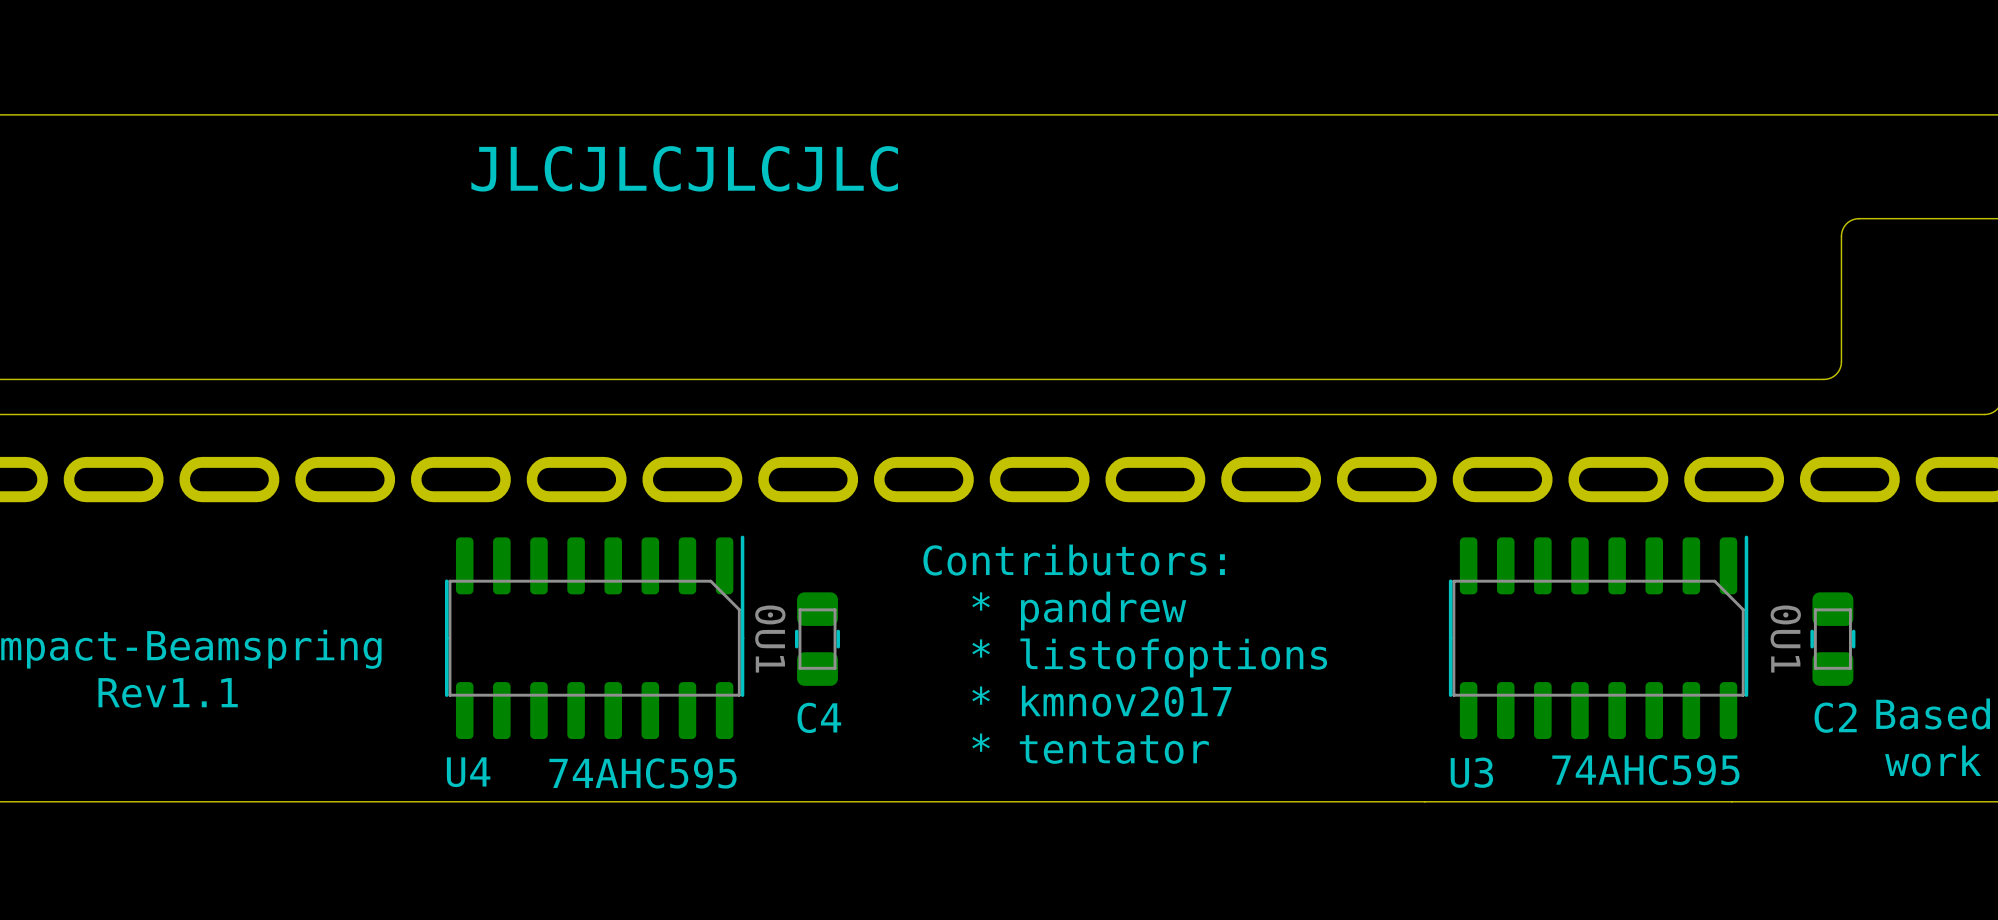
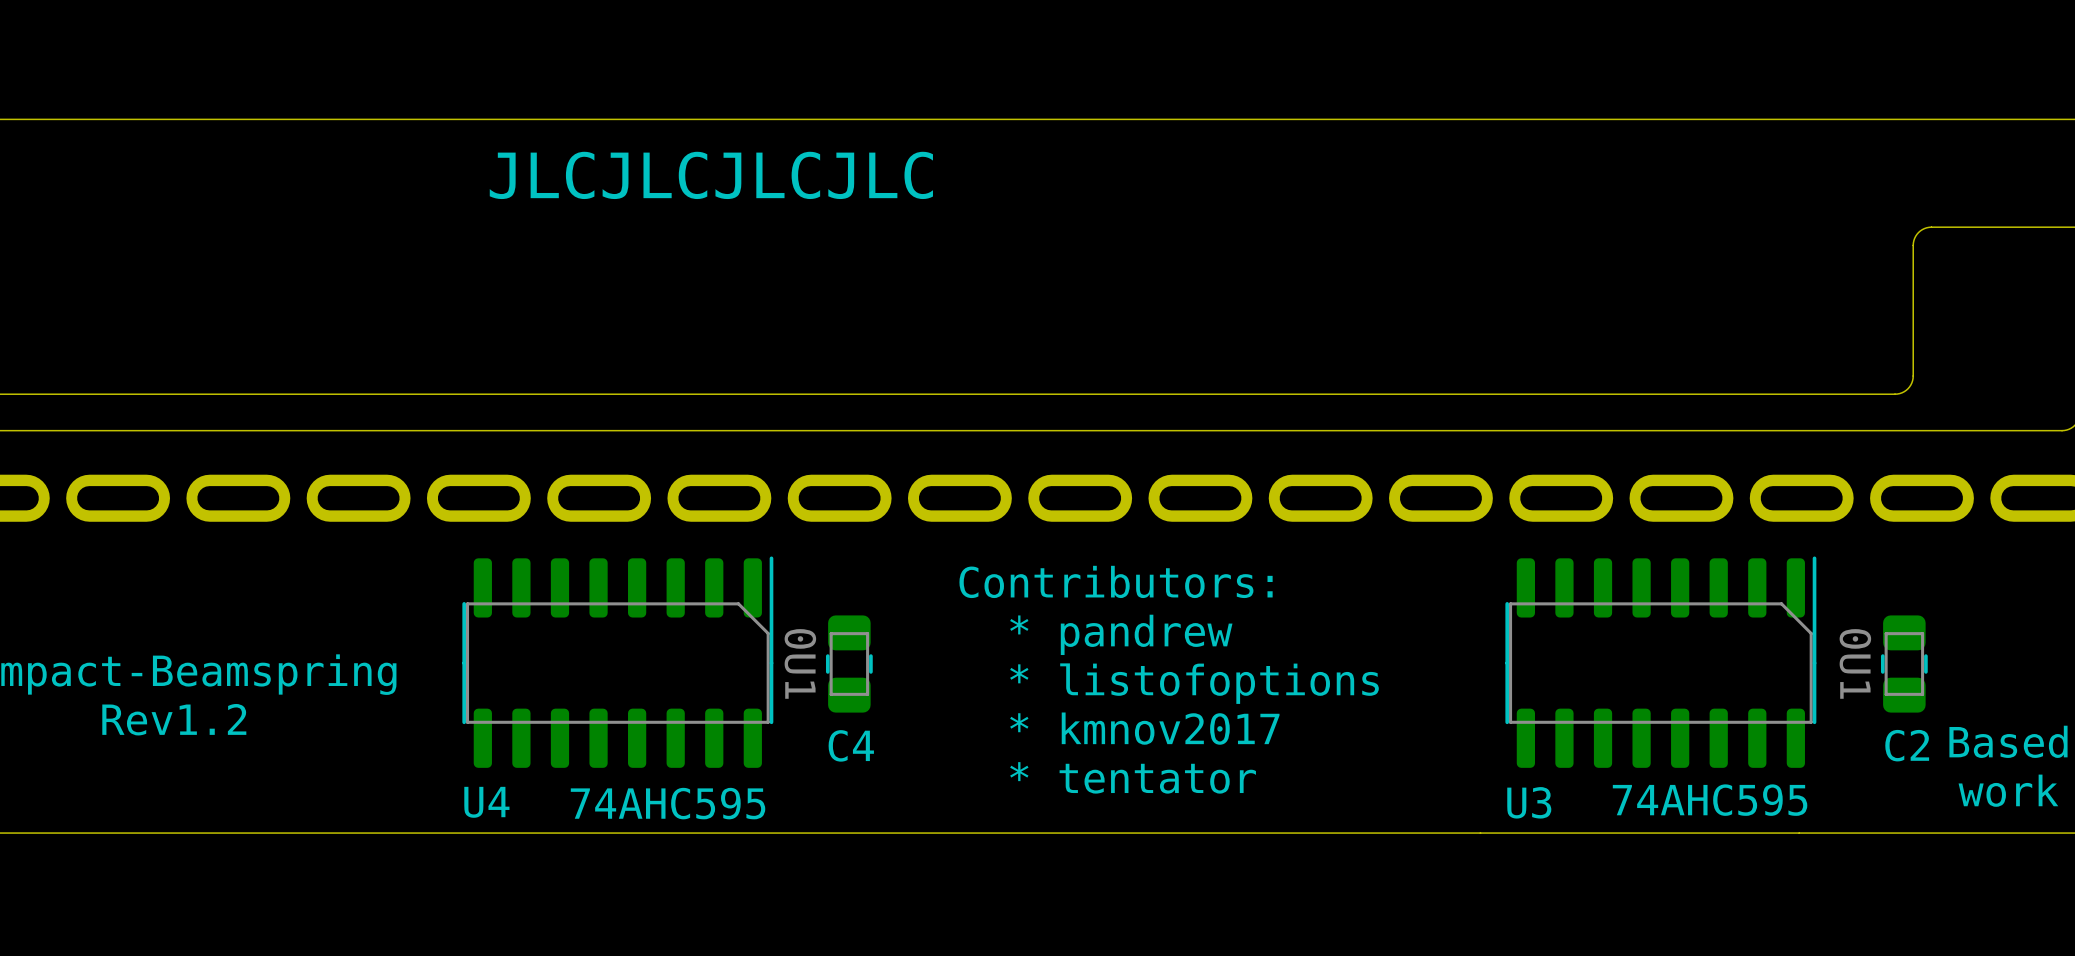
text: Rev1.1 (168, 692) -> Rev1.2 (174, 719)

